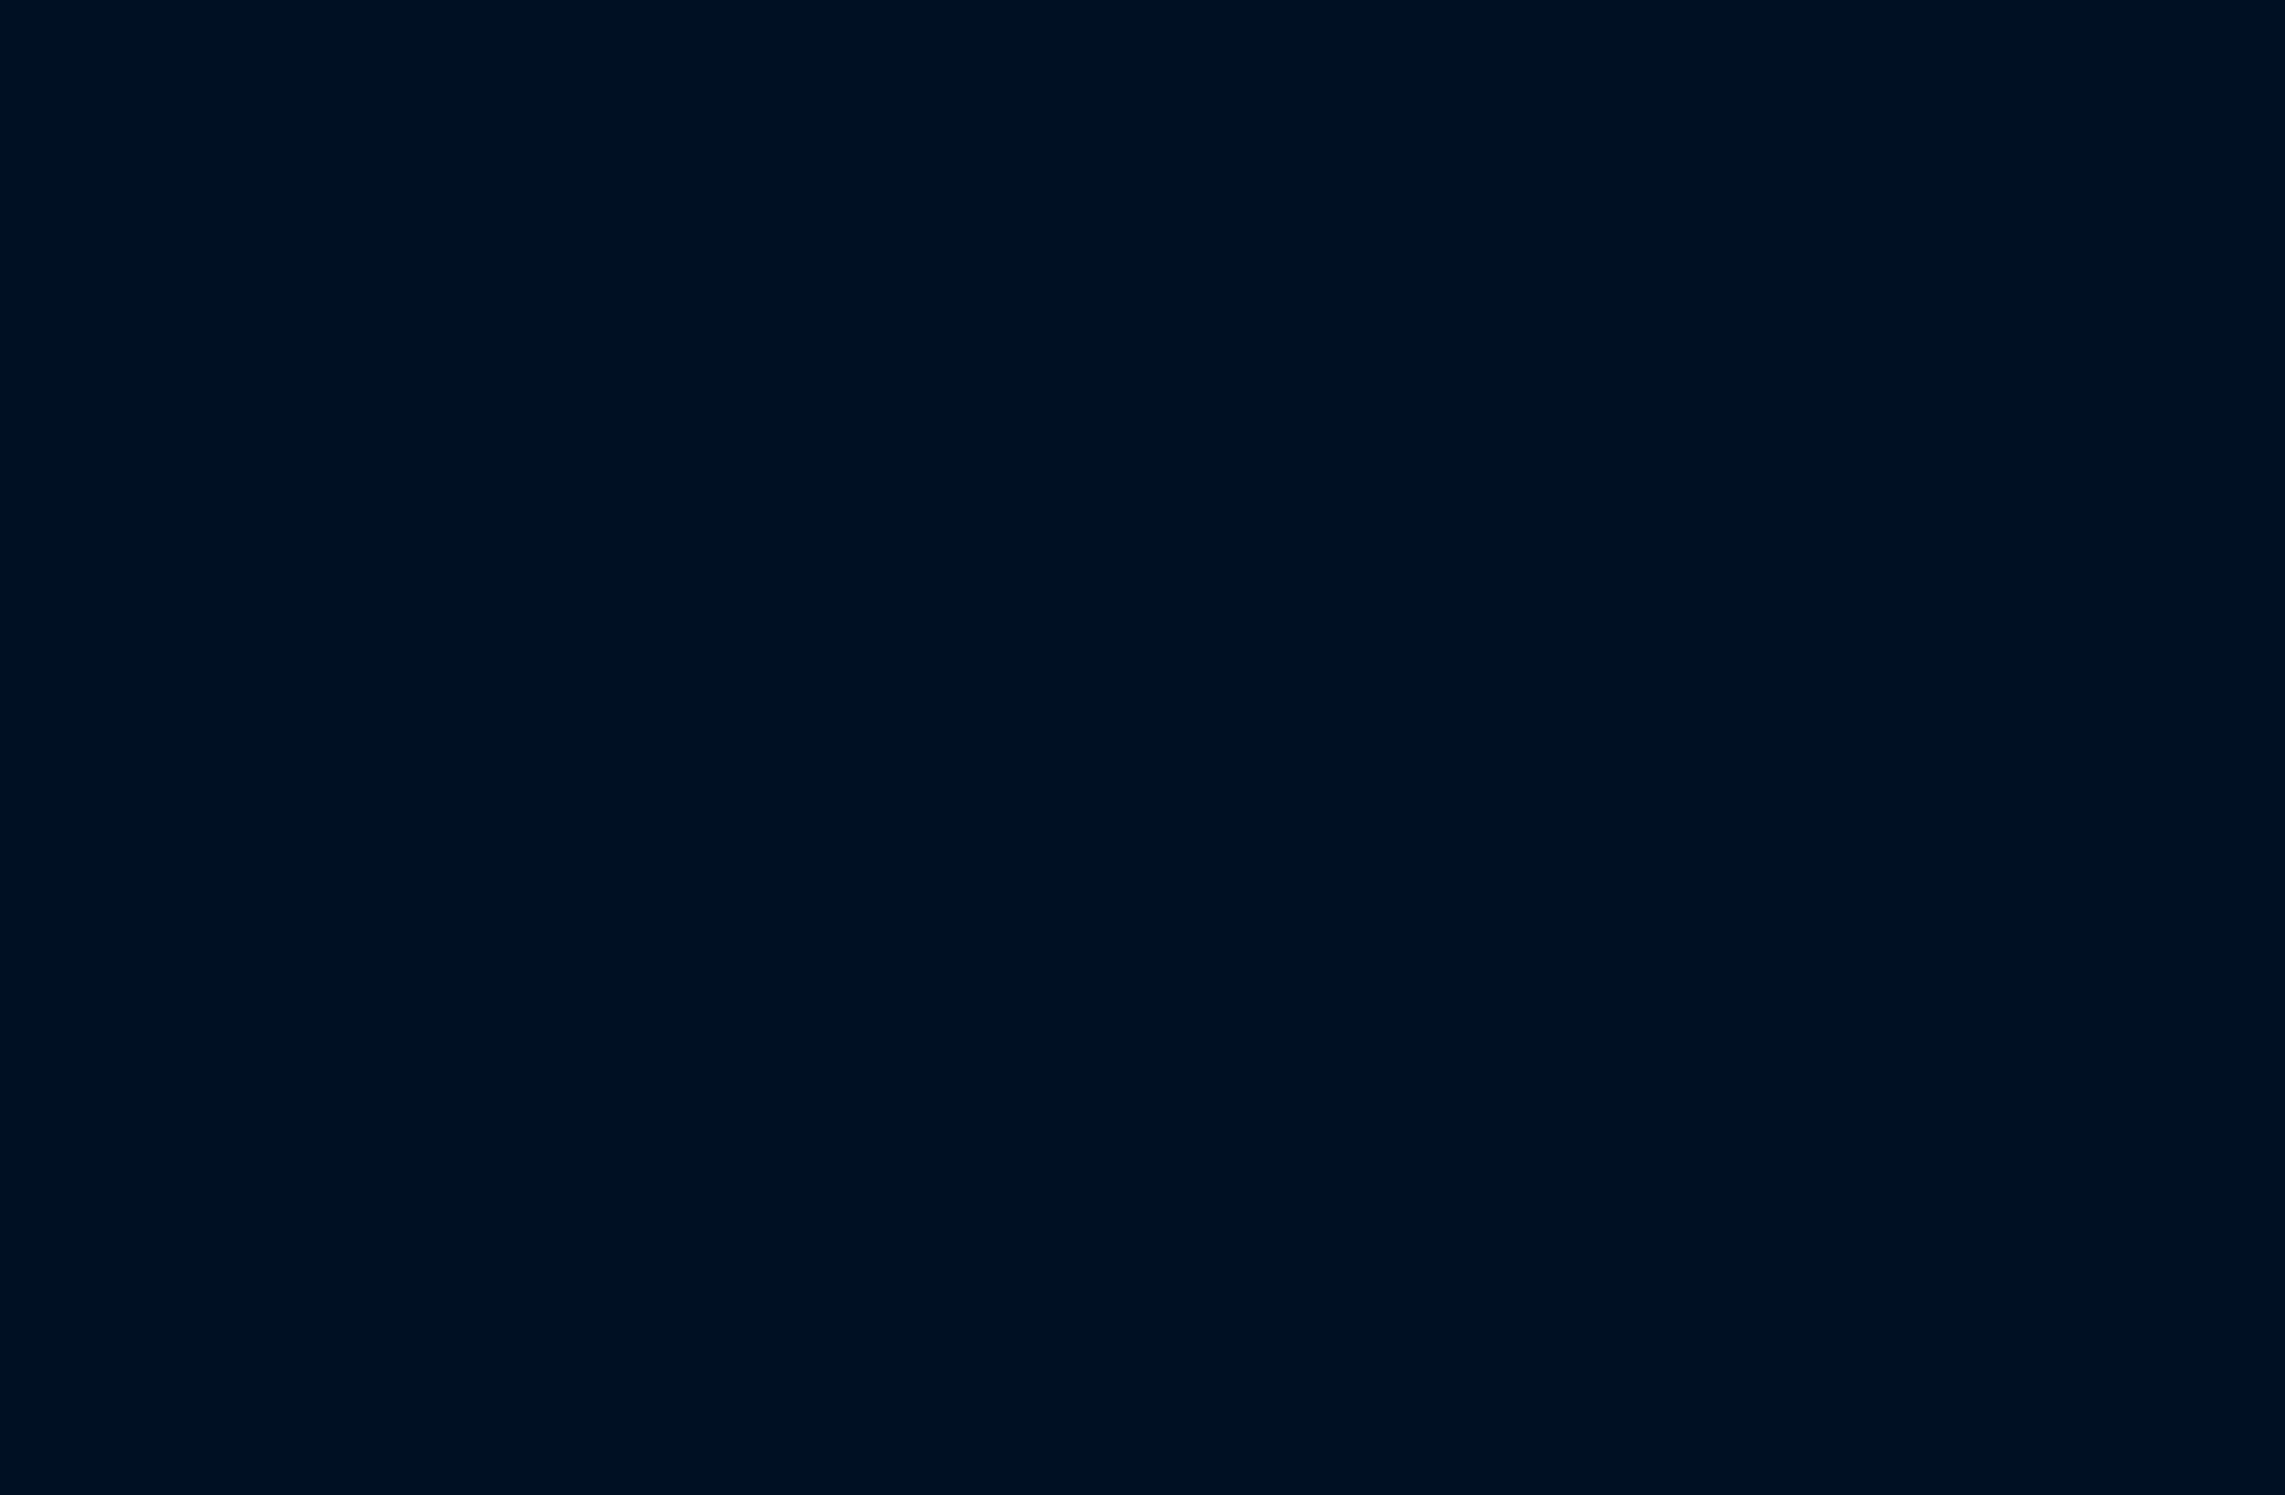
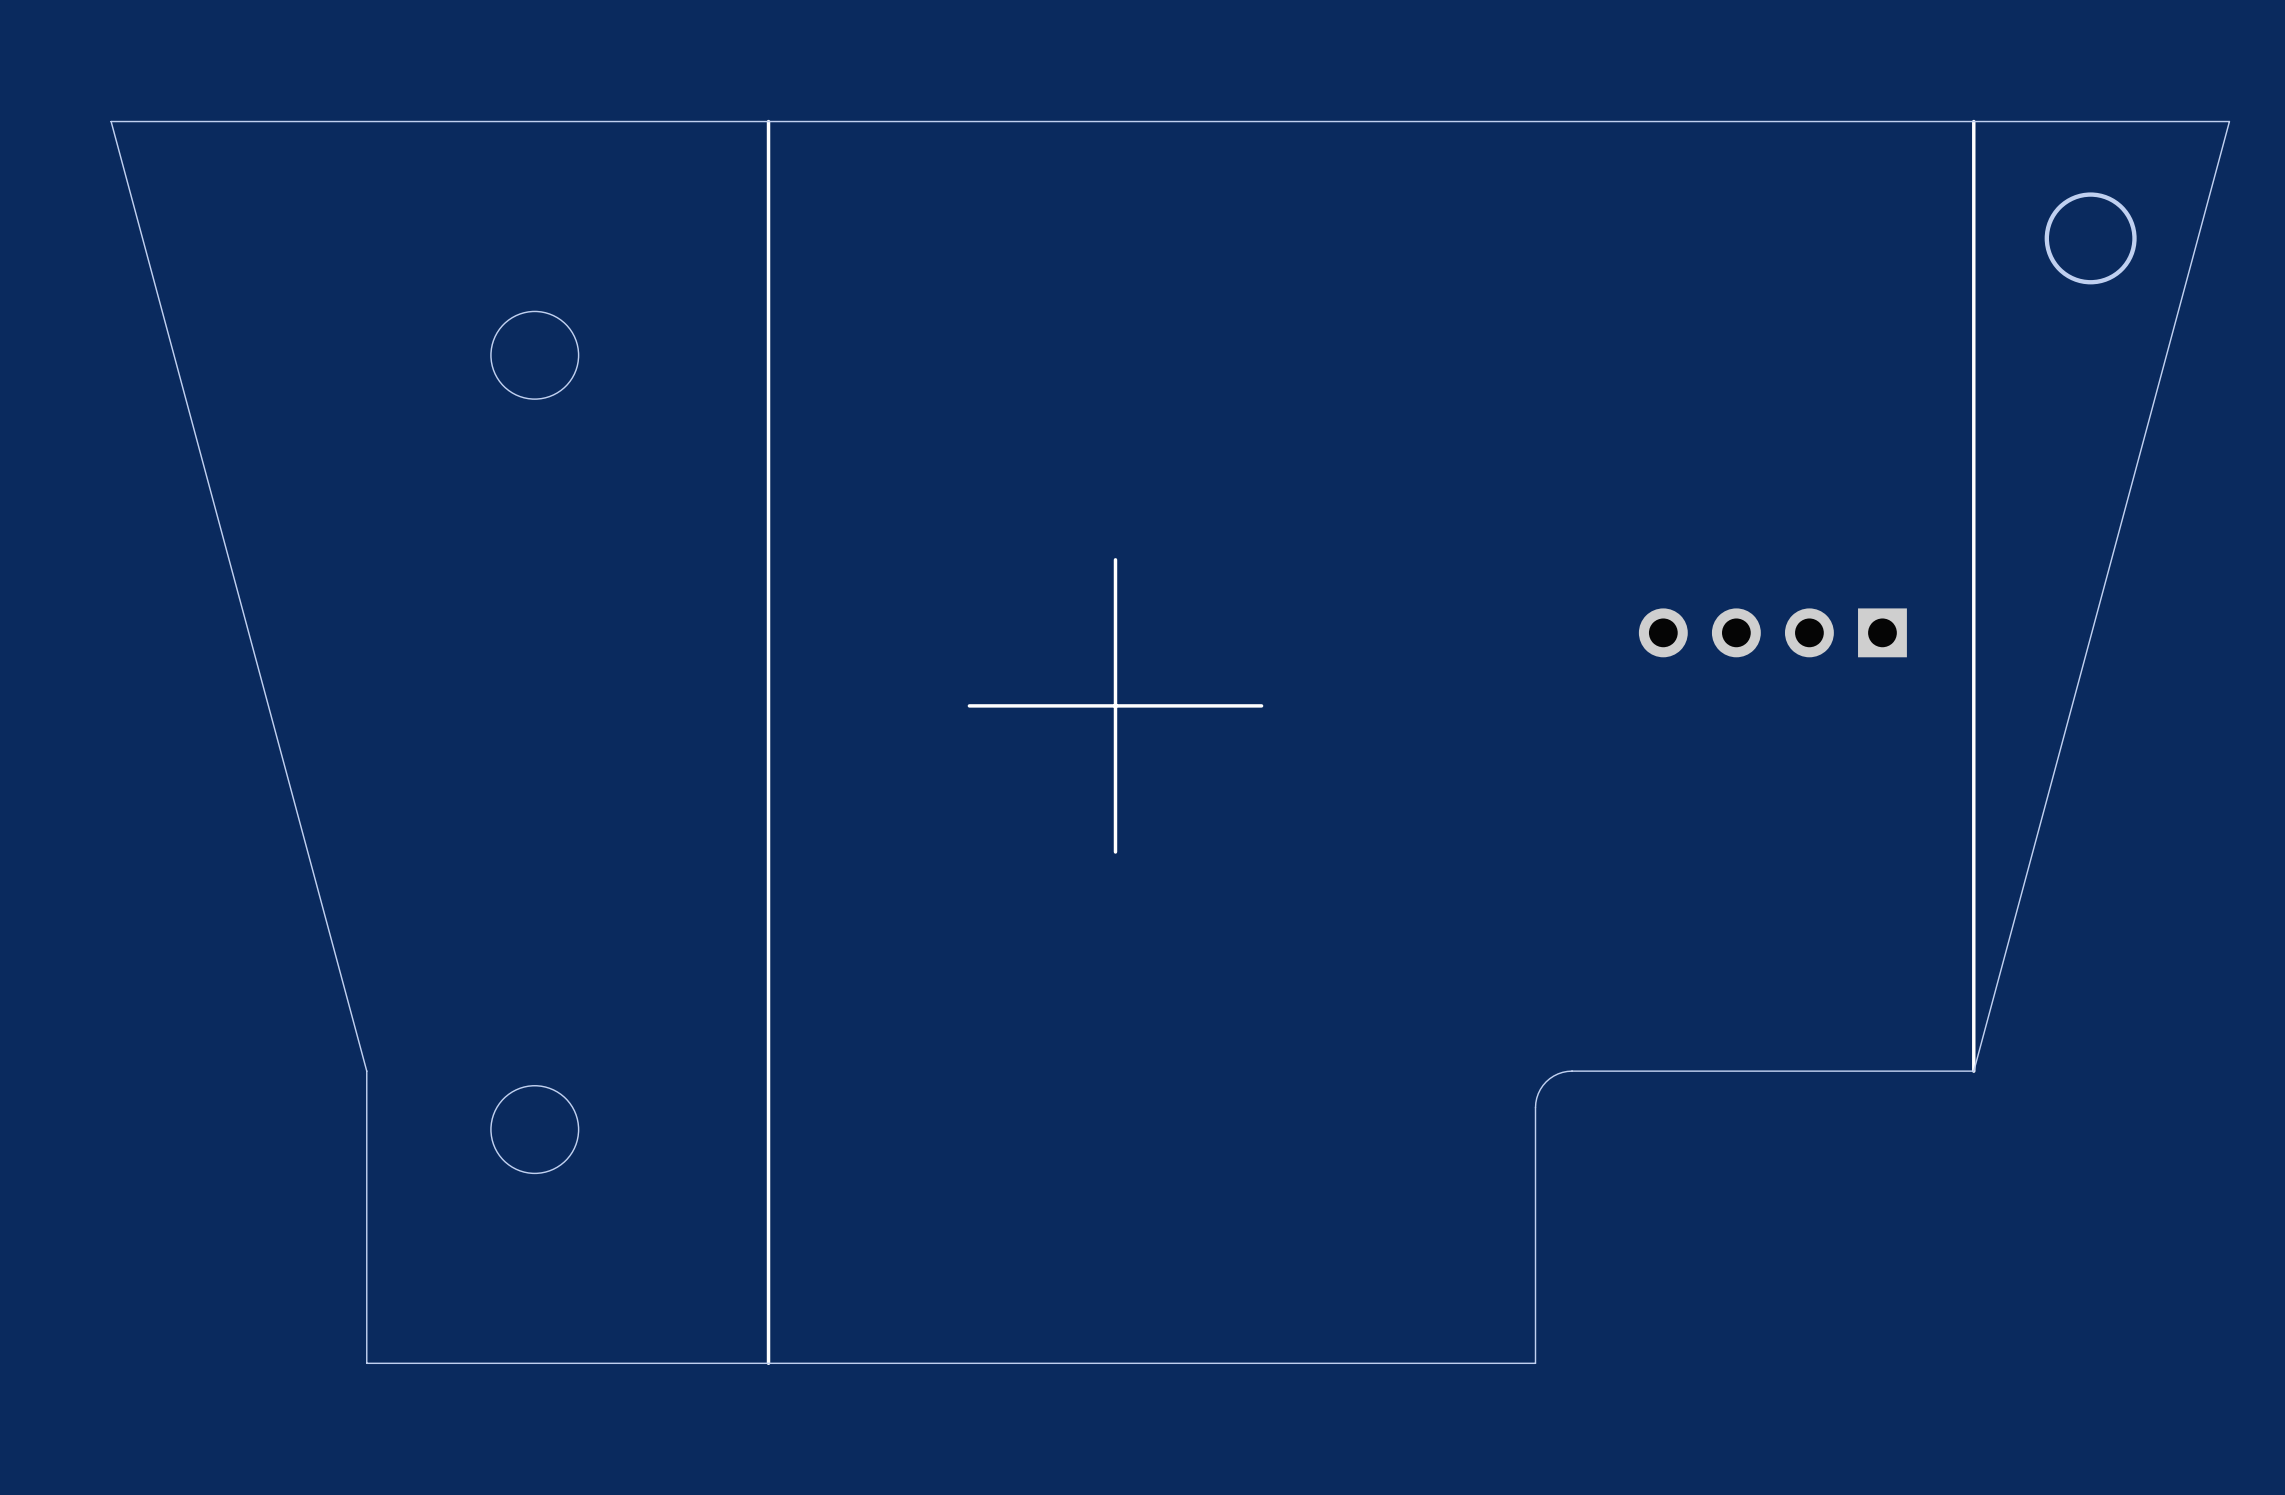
line: none -> (768, 121) (768, 1363)
line: none -> (1973, 121) (1973, 1071)
board edge: none -> (2229, 121) (1973, 1071) (1572, 1071) (1553, 1076) (1540, 1089) (1535, 1107) (1535, 1363) (366, 1363) (366, 1071) (111, 121) (2229, 121)
round board edge: none -> [2044, 192, 2137, 285]
round board edge: none -> [490, 310, 580, 400]
line: none -> (1115, 559) (1115, 851)
part: none -> (1772, 632)
line: none -> (1261, 705) (969, 705)
round board edge: none -> [490, 1085, 580, 1175]

